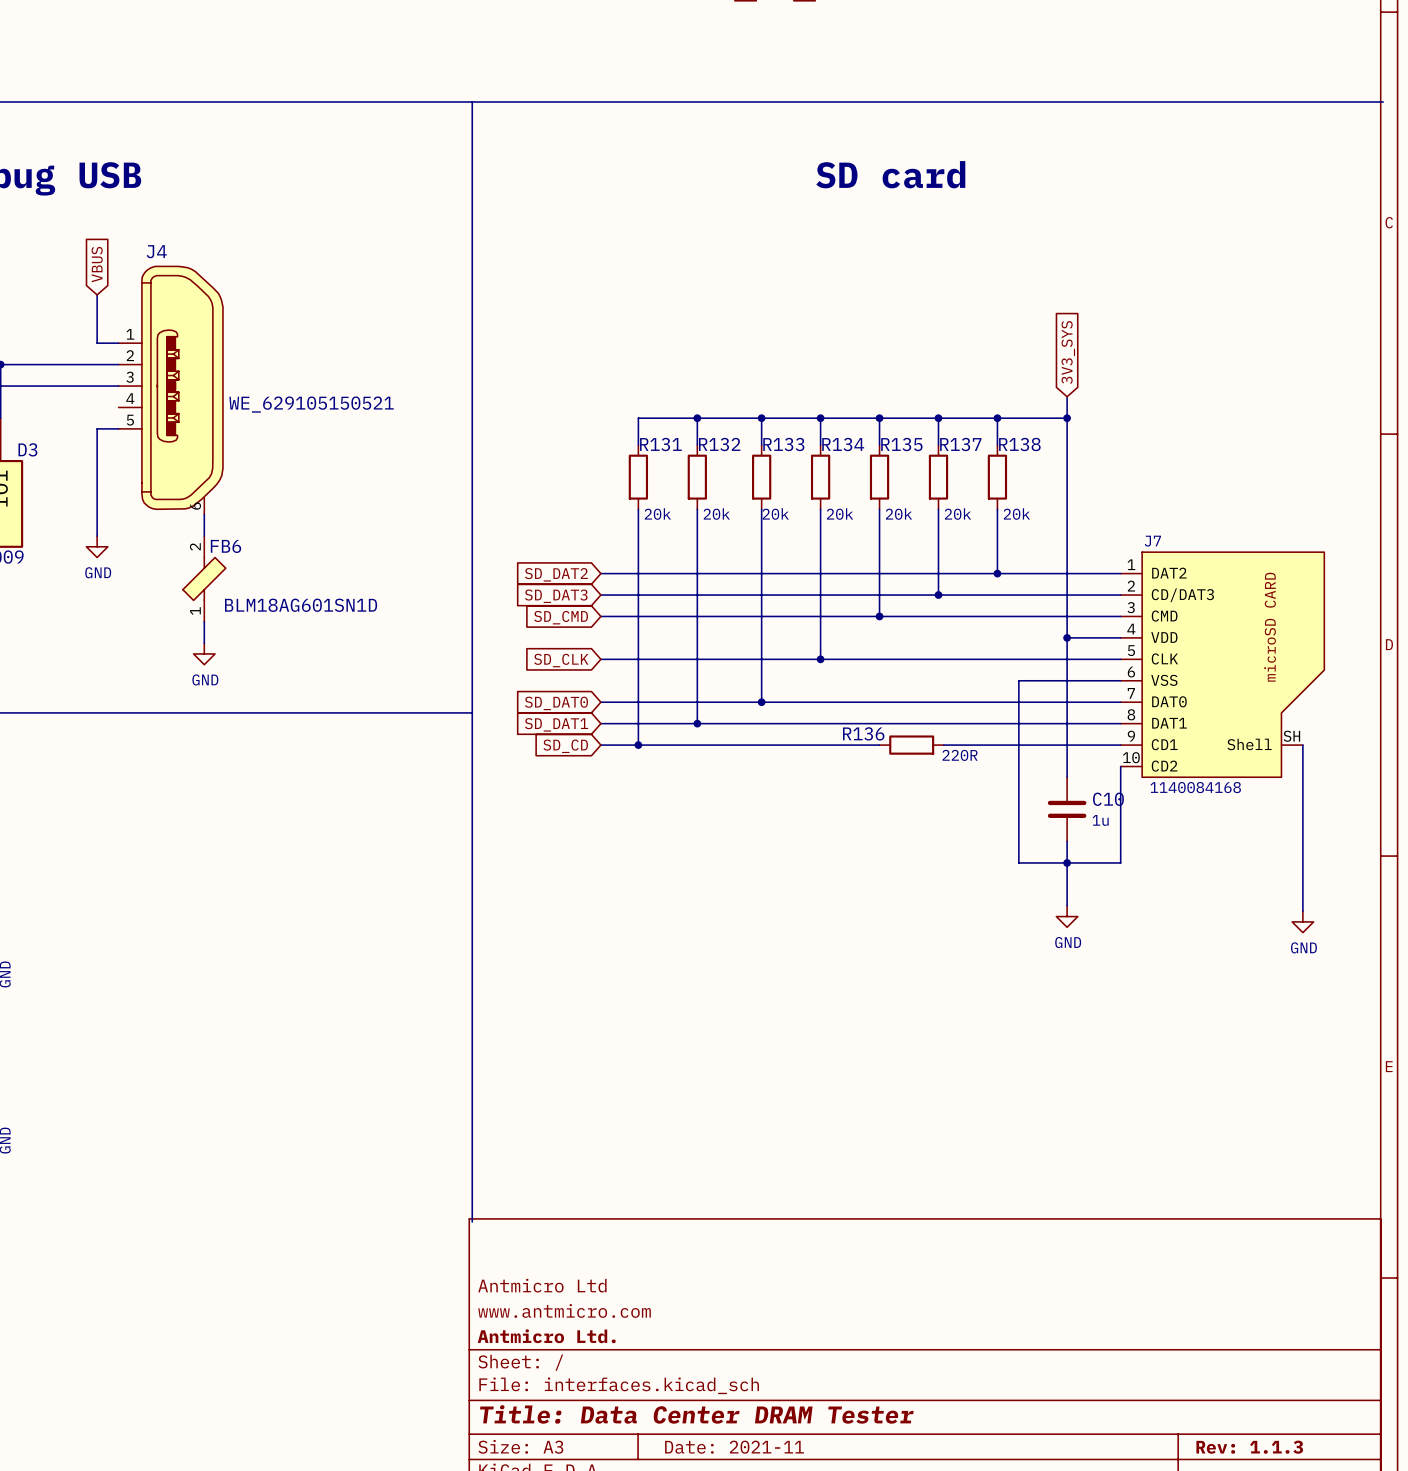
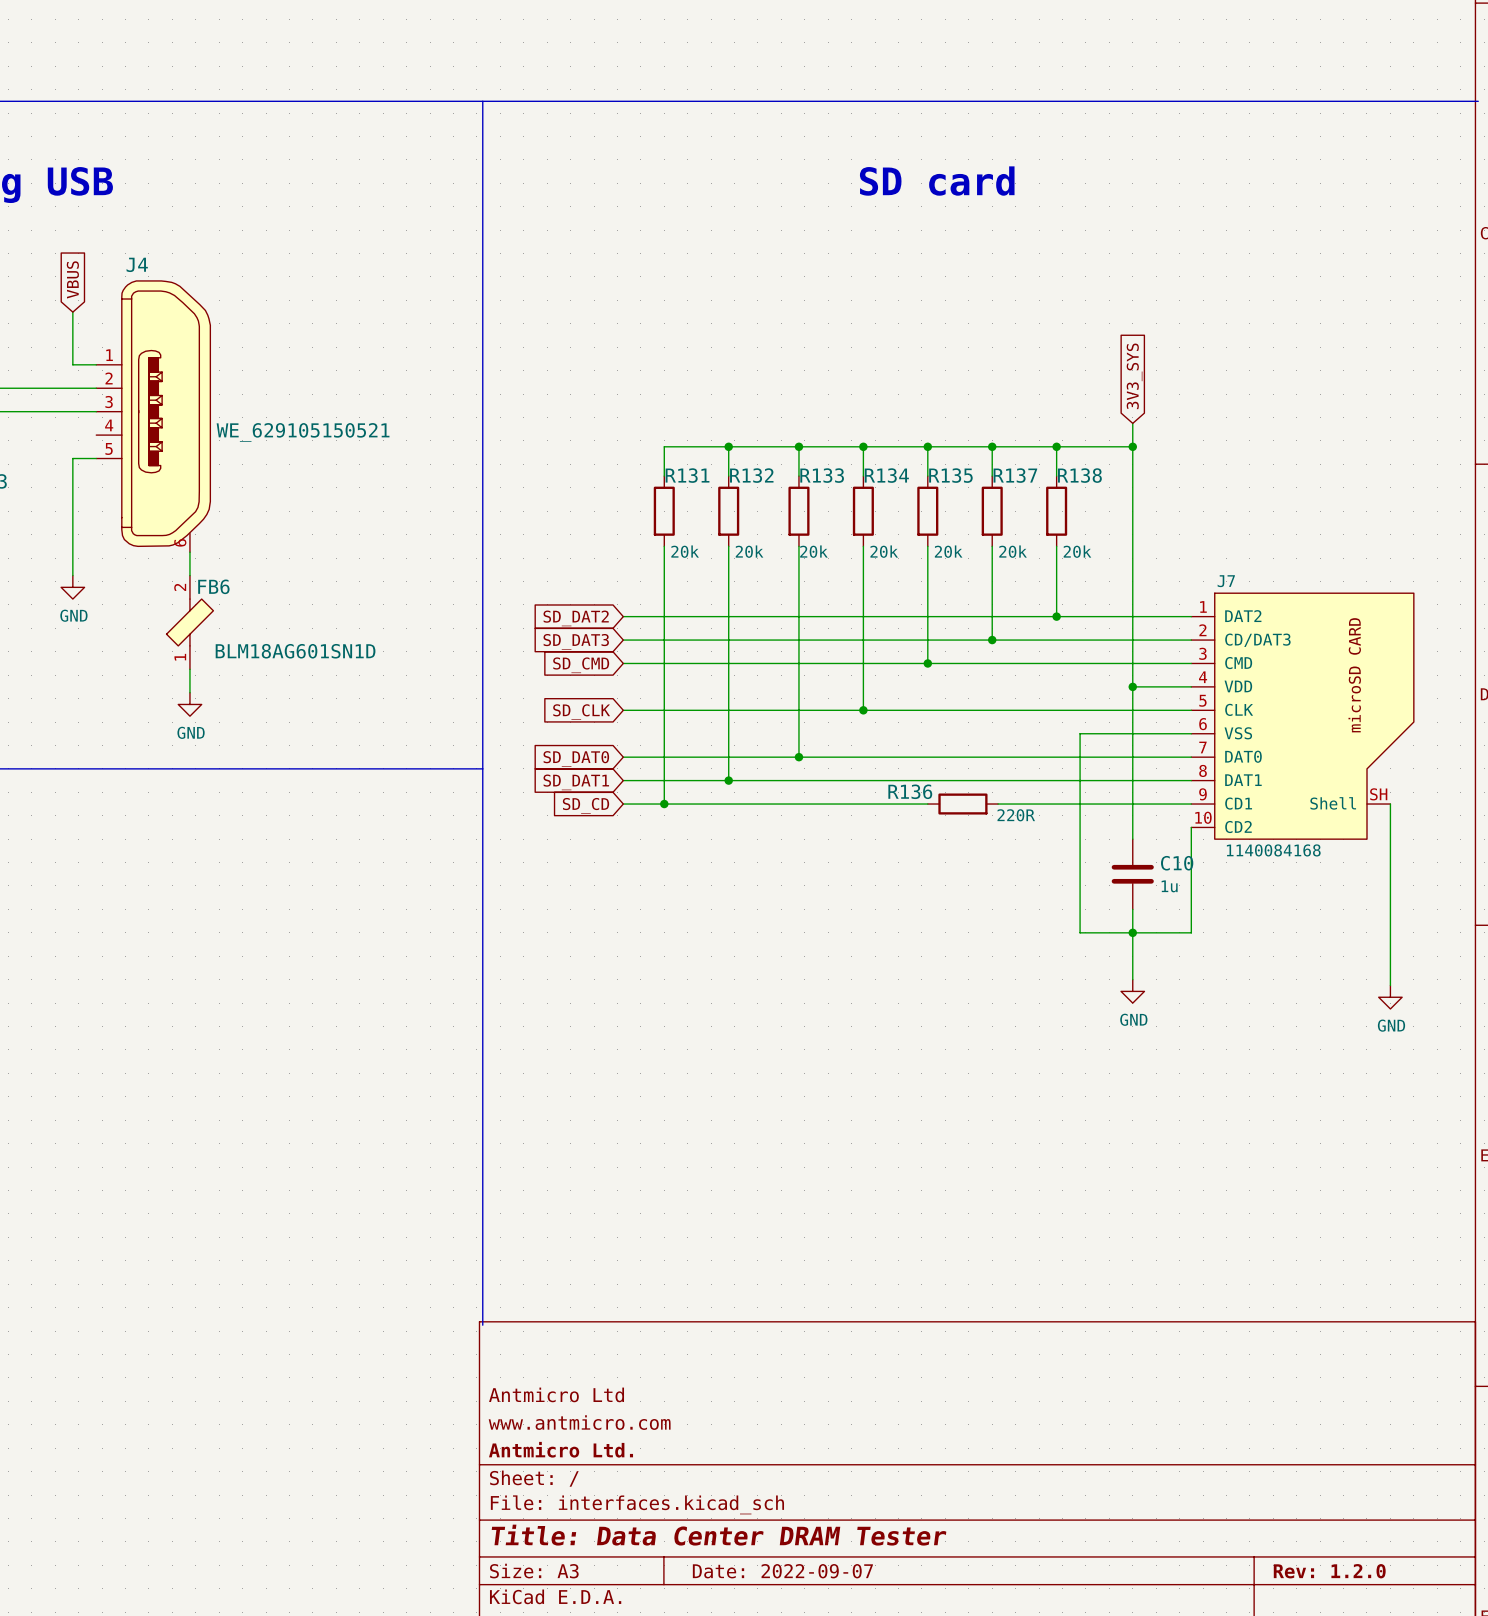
title block: Date: 2021-11 (734, 1447) -> Date: 2022-09-07 (782, 1571)
title block: Rev: 1.1.3 (1249, 1447) -> Rev: 1.2.0 (1329, 1571)

